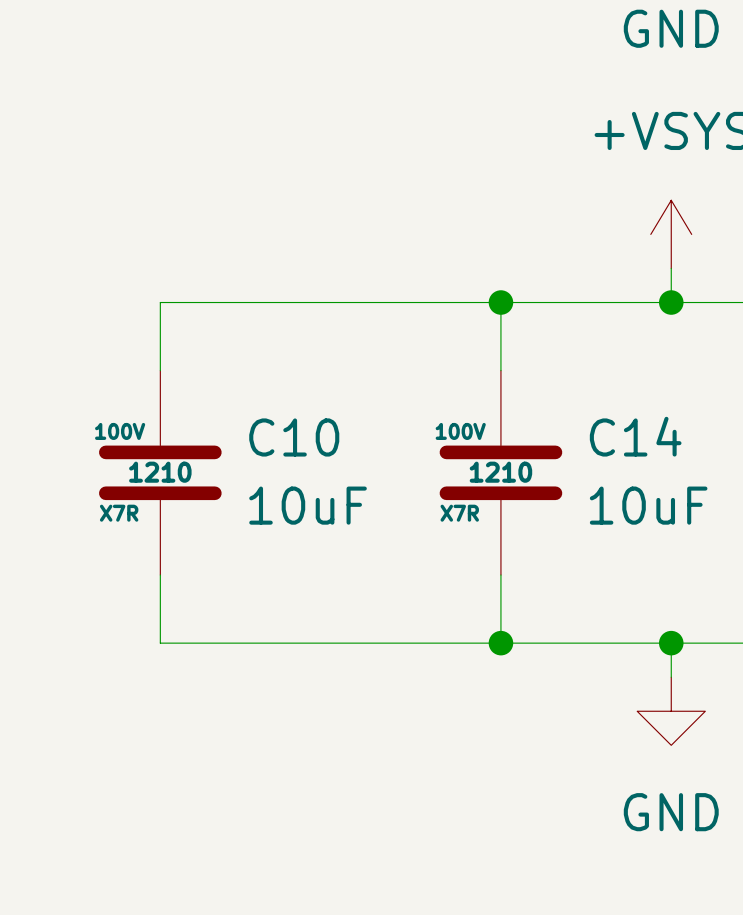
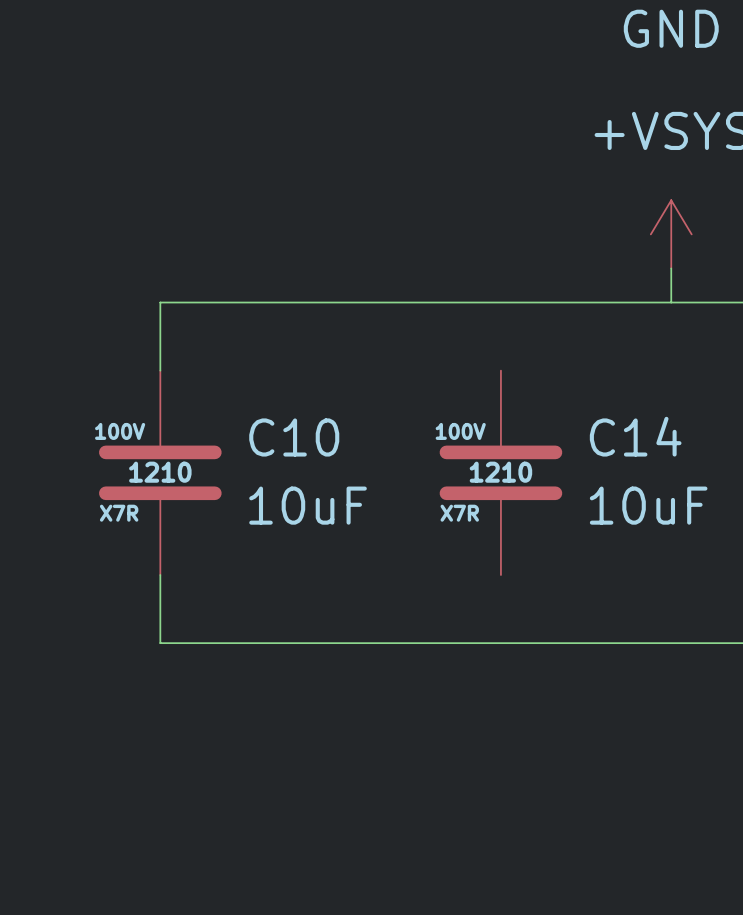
wire: (500, 302) (500, 370) -> none
junction: (500, 302) -> none
junction: (671, 302) -> none
wire: (500, 575) (500, 643) -> none
junction: (500, 643) -> none
wire: (671, 643) (671, 677) -> none
junction: (671, 643) -> none
power symbol: GND (671, 711) -> none

